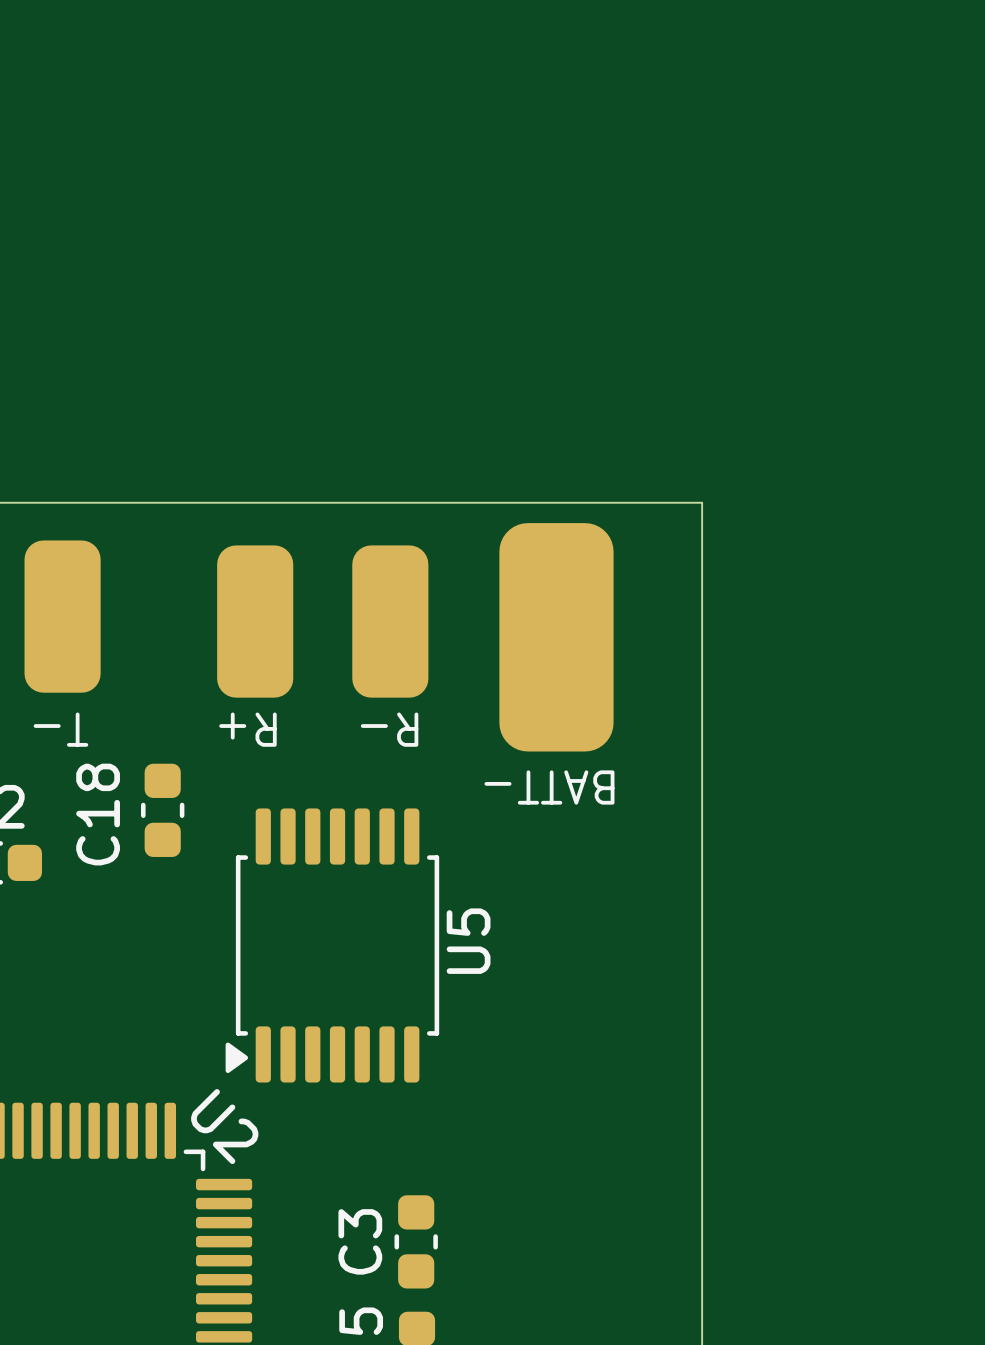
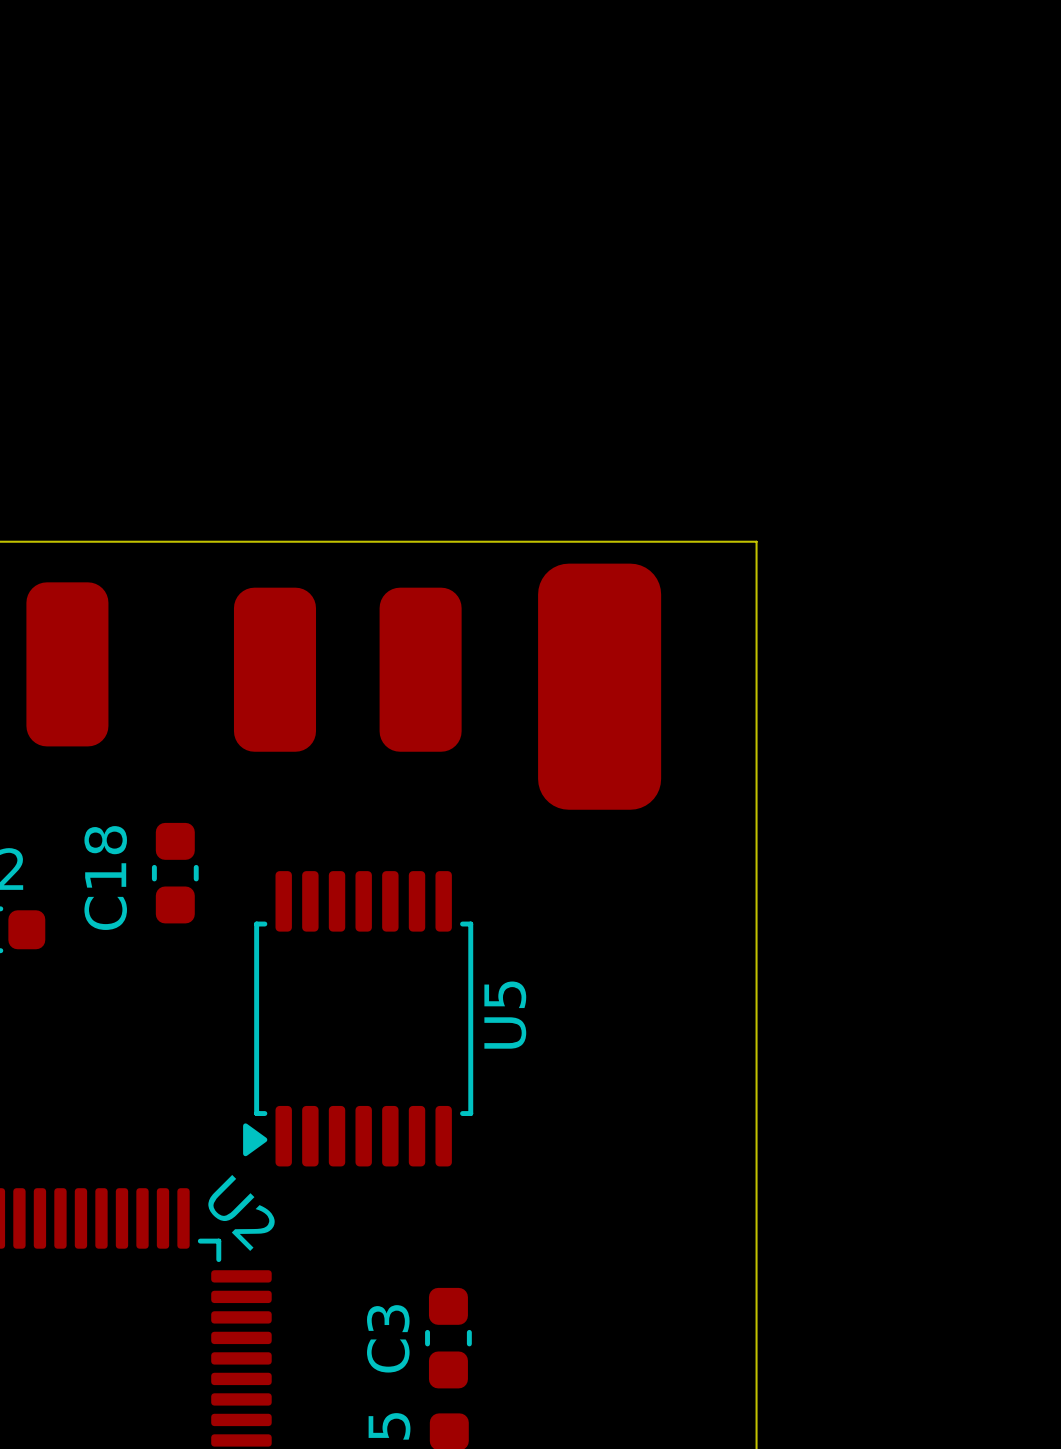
text: T- (60, 729) -> none
text: R+ (247, 729) -> none
text: R- (389, 729) -> none
text: BATT- (549, 787) -> none

